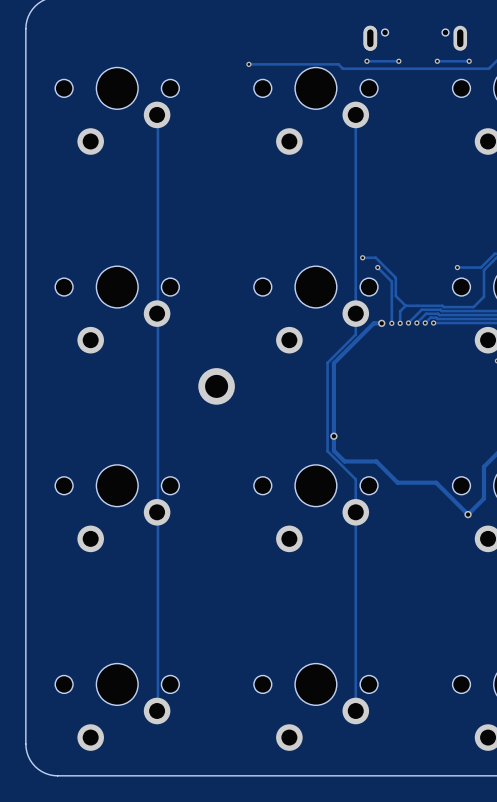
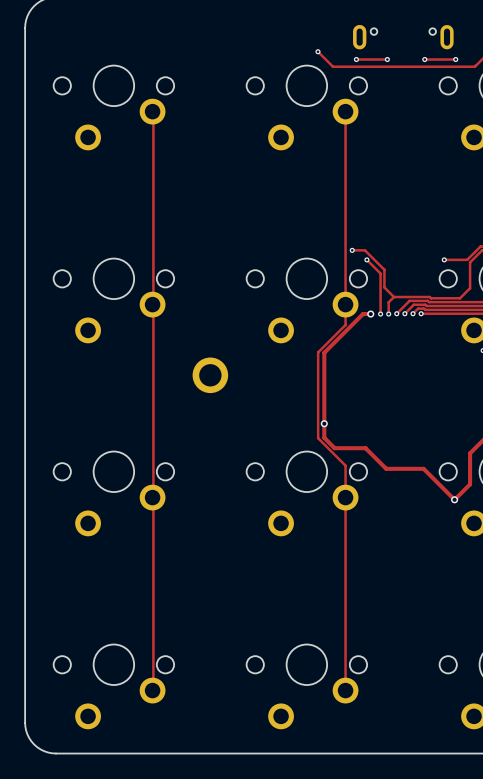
via: none -> (317, 51)
track: (248, 64) (338, 64) -> (317, 51) (328, 62)
via: (248, 64) -> none

